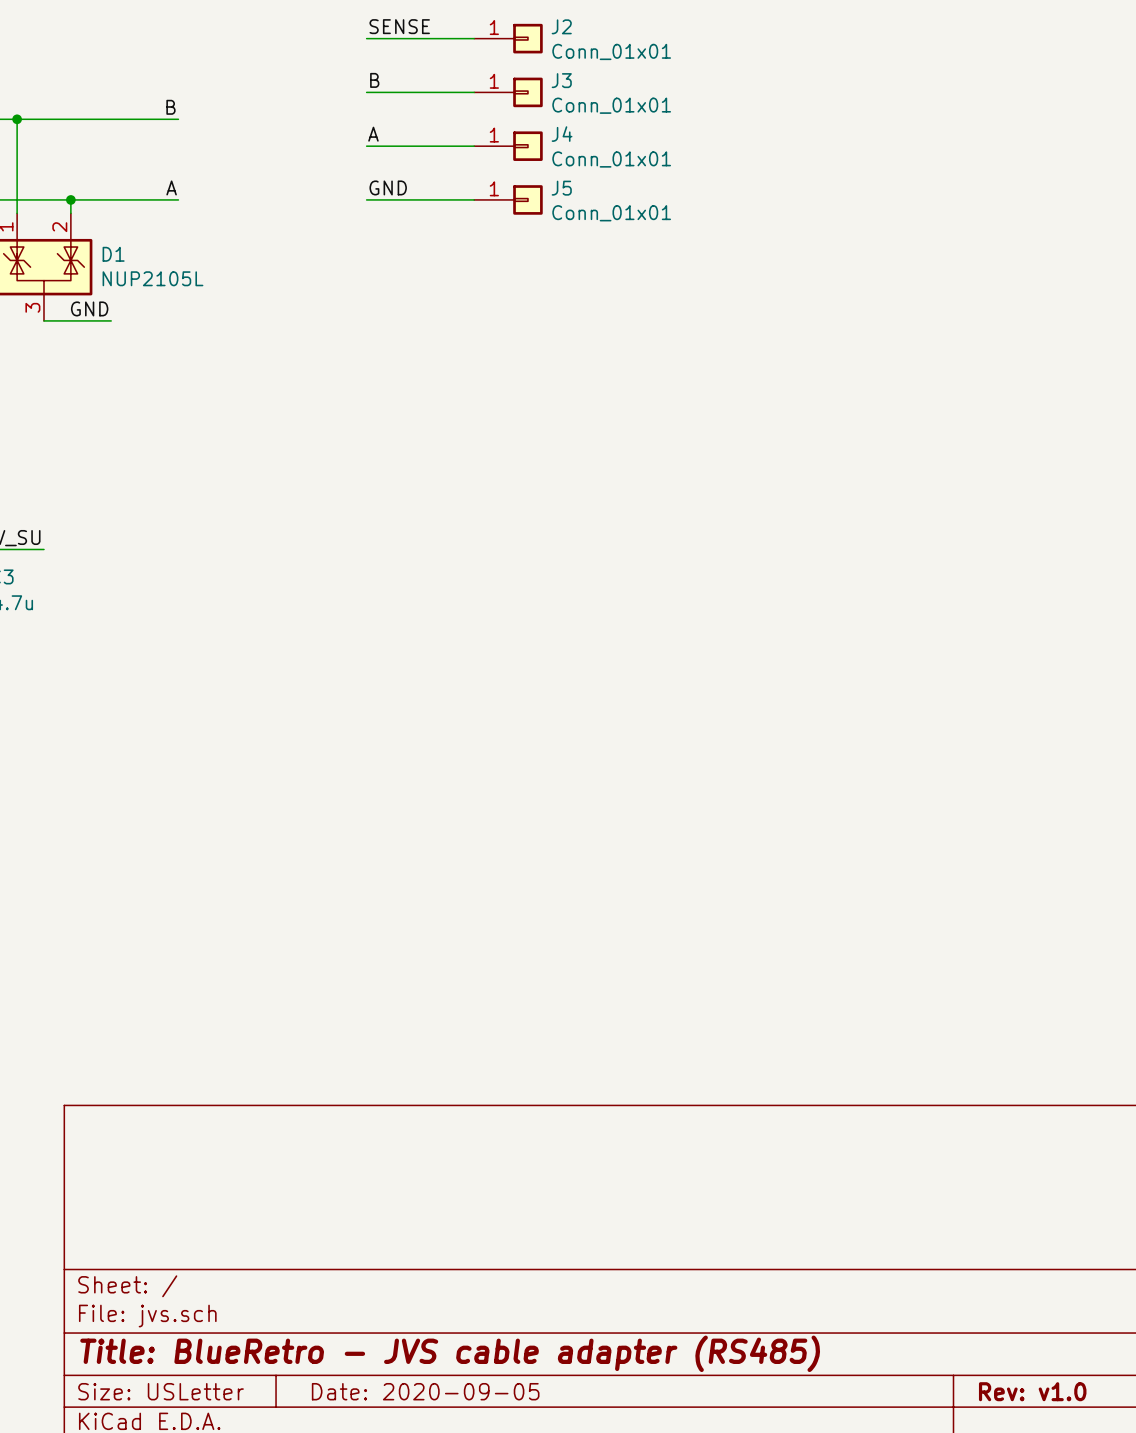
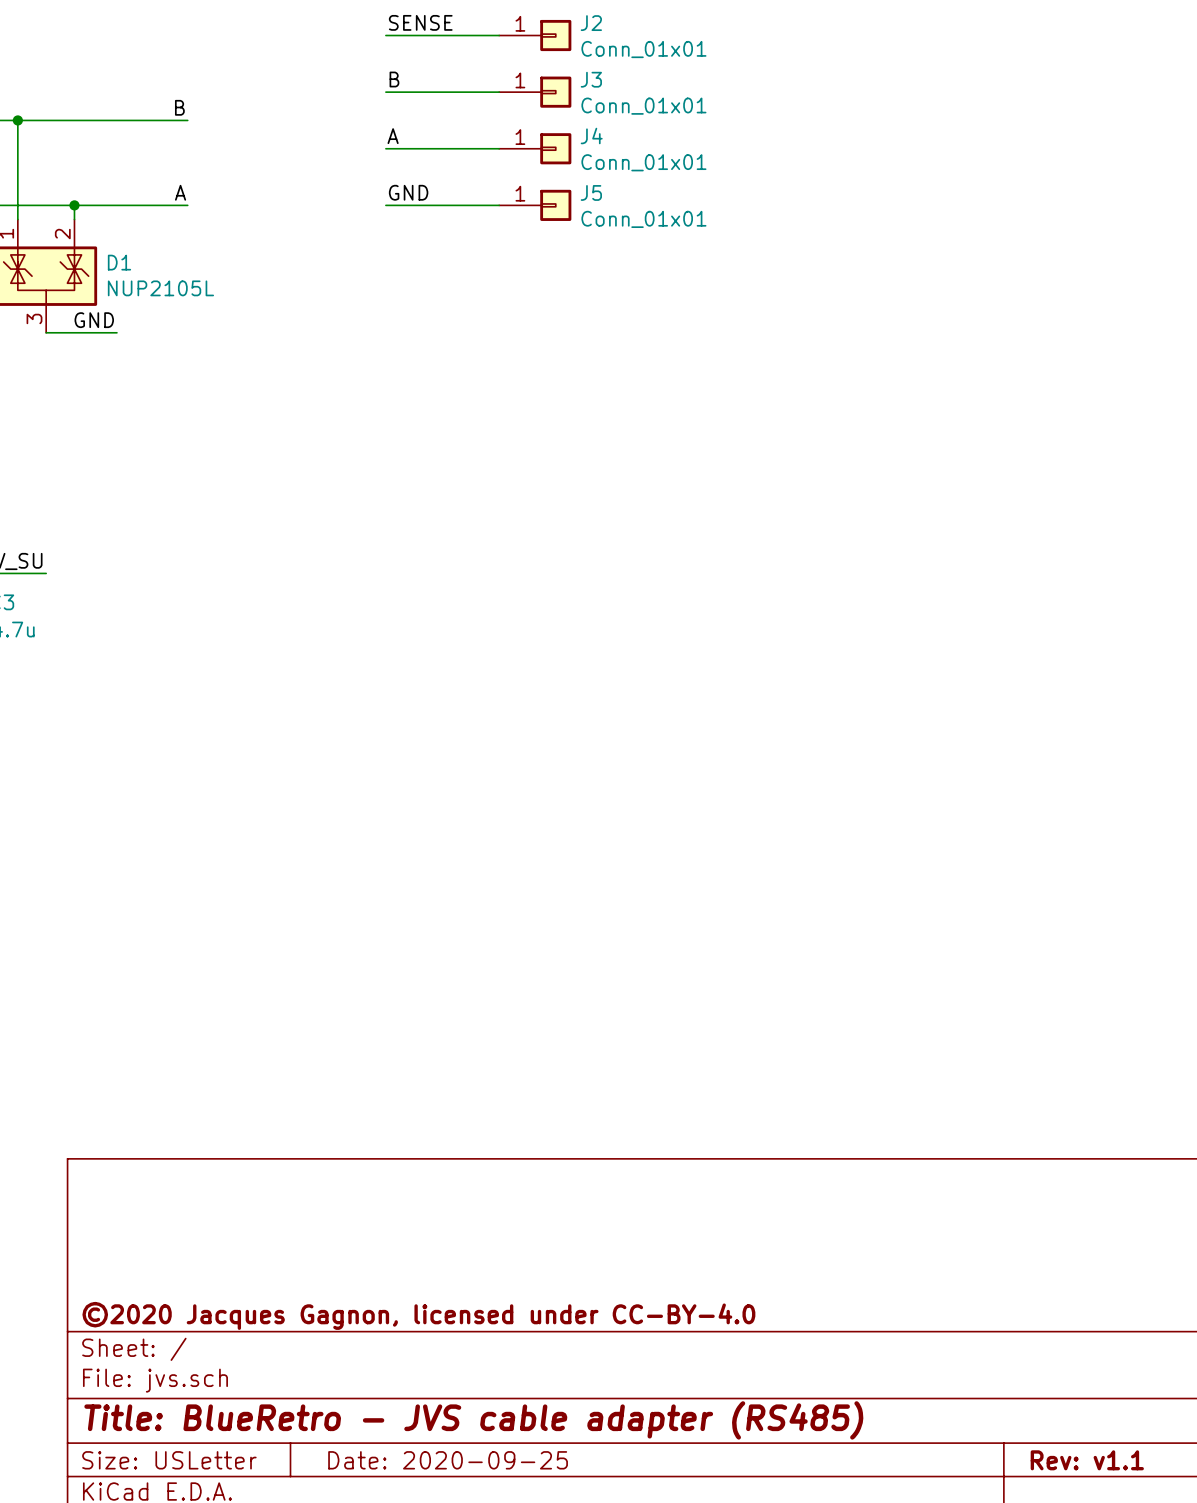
title block: none -> ©2020 Jacques Gagnon, licensed under CC-BY-4.0 (418, 1315)
title block: Date: 2020-09-05 (425, 1391) -> Date: 2020-09-25 (448, 1460)
title block: Rev: v1.0 (1032, 1391) -> Rev: v1.1 (1087, 1460)

